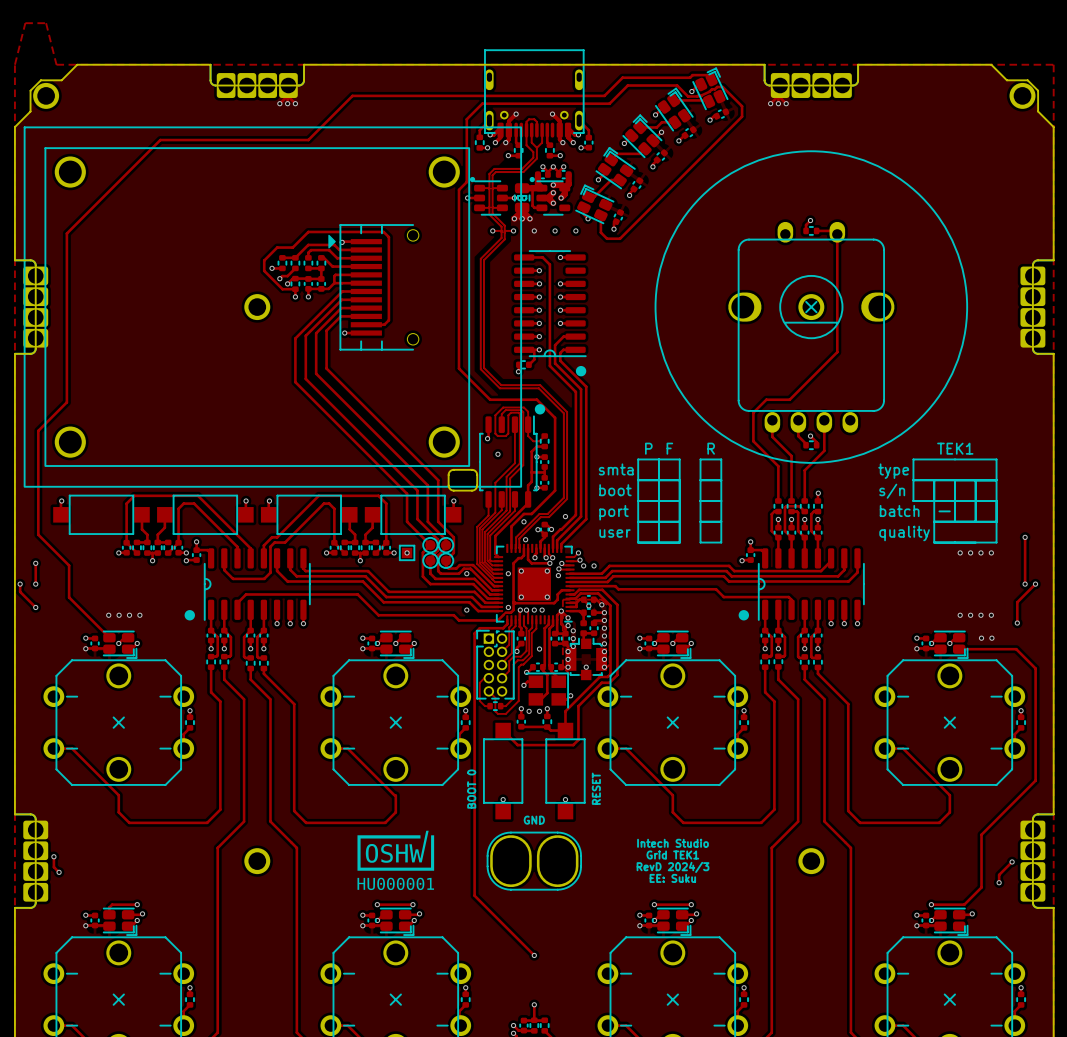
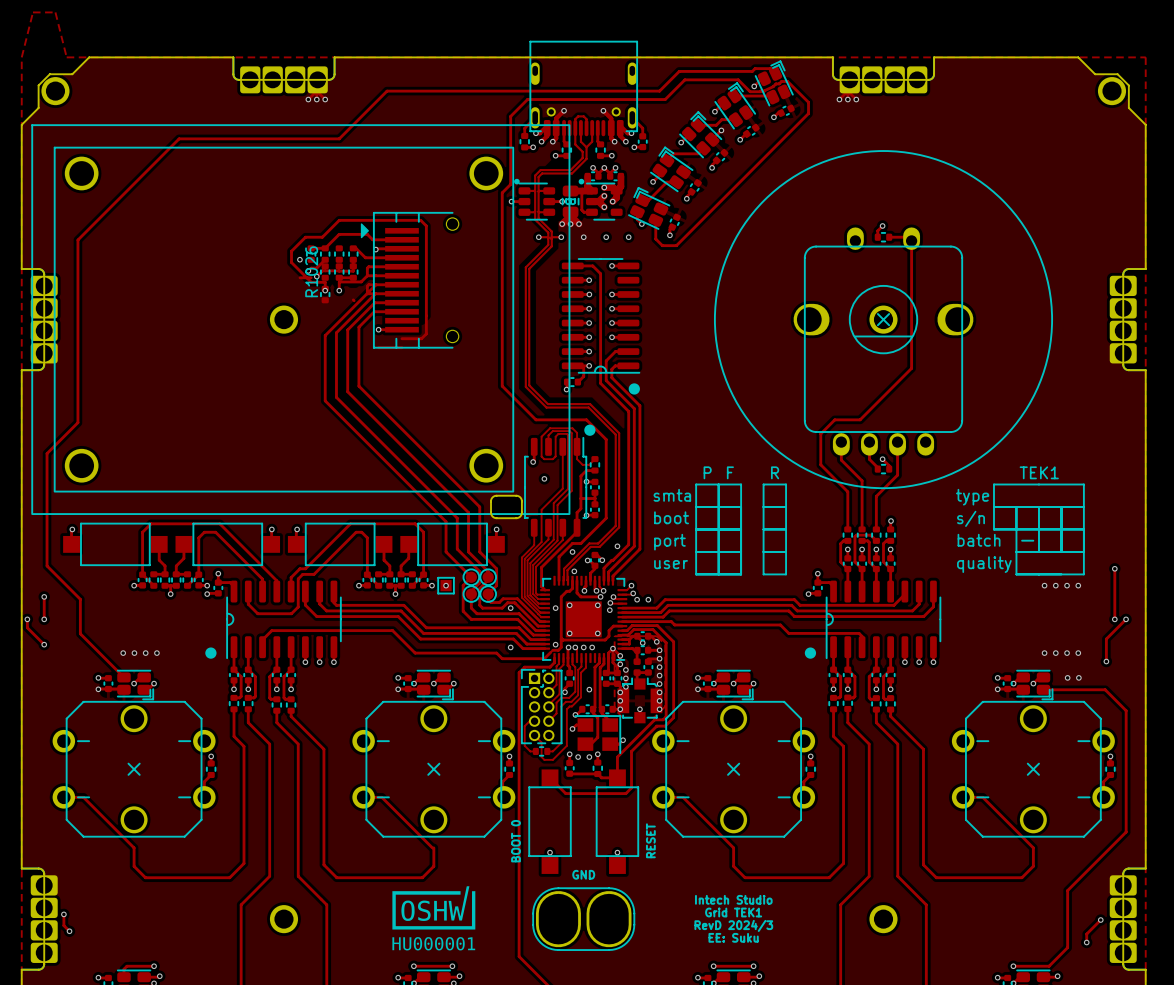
part footprint: [23, 126, 522, 488] -> [31, 124, 571, 515]
track: none -> (401, 239) (372, 239) (367, 234) (339, 234) (325, 248) (311, 248)
track: (388, 237) (383, 231) (308, 231) (292, 247) (277, 247) (264, 260) (264, 270) (282, 289) (295, 289) (295, 296) -> (426, 243) (426, 225) (420, 220) (339, 220) (322, 237) (305, 237) (291, 251) (291, 262) (311, 282) (325, 282) (325, 290)
part: none -> (311, 254)
part: none -> (325, 254)
part: none -> (339, 254)
part: none -> (353, 254)
track: (339, 249) (334, 244) (308, 244) (295, 257) (282, 257) -> (372, 257) (365, 257) (356, 248) (353, 248)
via: none -> (299, 259)
track: (308, 257) (308, 252) (310, 250) (329, 250) (337, 258) -> (339, 290) (339, 281) (361, 281) (367, 275) (367, 268) (370, 266)
track: (321, 257) (334, 266) -> none
via: none -> (308, 270)
R1026 name: none -> R1026 (311, 271)
part: (282, 263) -> none
via: none -> (316, 276)
via: (272, 268) -> none
track: (295, 268) (287, 276) (282, 276) (279, 278) -> (325, 259) (316, 268) (311, 268) (308, 270)
track: (321, 268) (321, 278) (292, 278) (287, 283) -> (353, 259) (353, 271) (322, 270) (316, 276)
via: (279, 278) -> none
via: none -> (325, 290)
via: none -> (339, 290)
via: (287, 283) -> none
part: (308, 283) -> none
part: (321, 283) -> none
track: (334, 283) (328, 288) (308, 288) (308, 296) -> none
track: (342, 291) (295, 338) -> (376, 284) (325, 335) (325, 353)
via: (295, 296) -> none
via: (308, 296) -> none
track: (341, 299) (305, 335) -> (375, 293) (336, 332) (336, 350)
track: (366, 308) (341, 308) (316, 333) -> (376, 302) (347, 329) (347, 347)
track: (344, 316) (340, 316) (326, 330) -> (375, 311) (358, 327) (358, 345)
via position: (344, 333) -> (378, 329)

